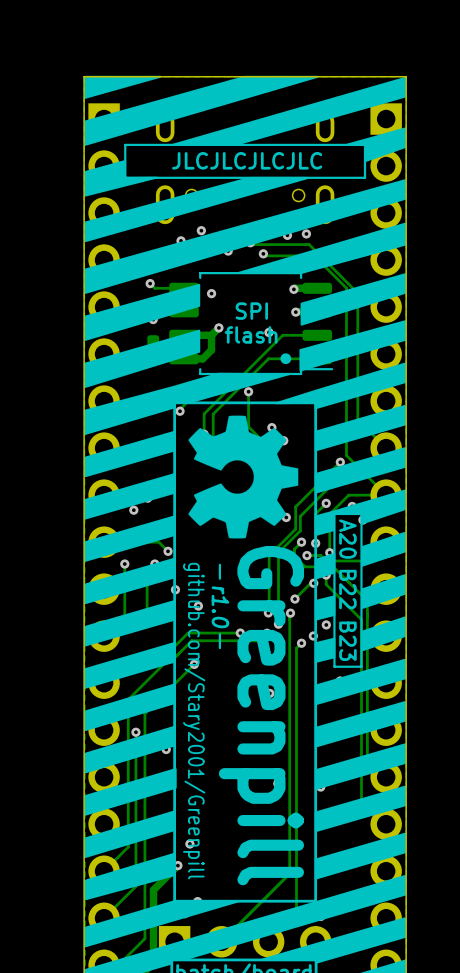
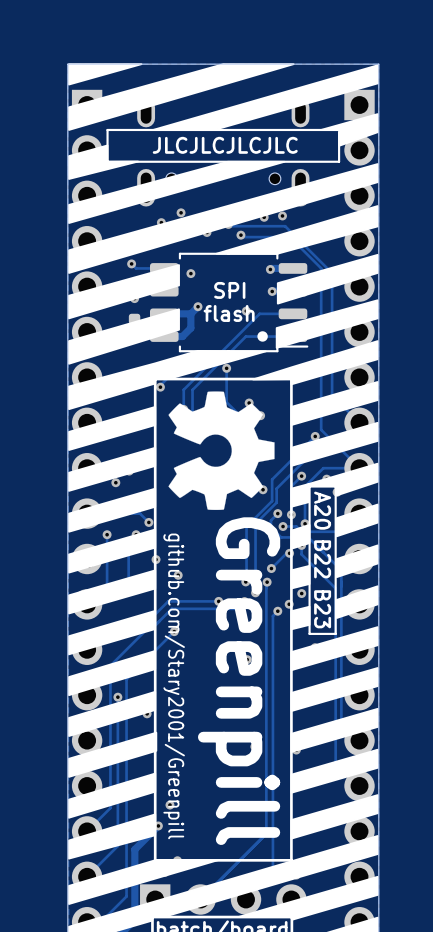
line: (219, 564) (219, 578) -> none
text: r1.0 (220, 607) -> none
line: (219, 634) (219, 648) -> none

